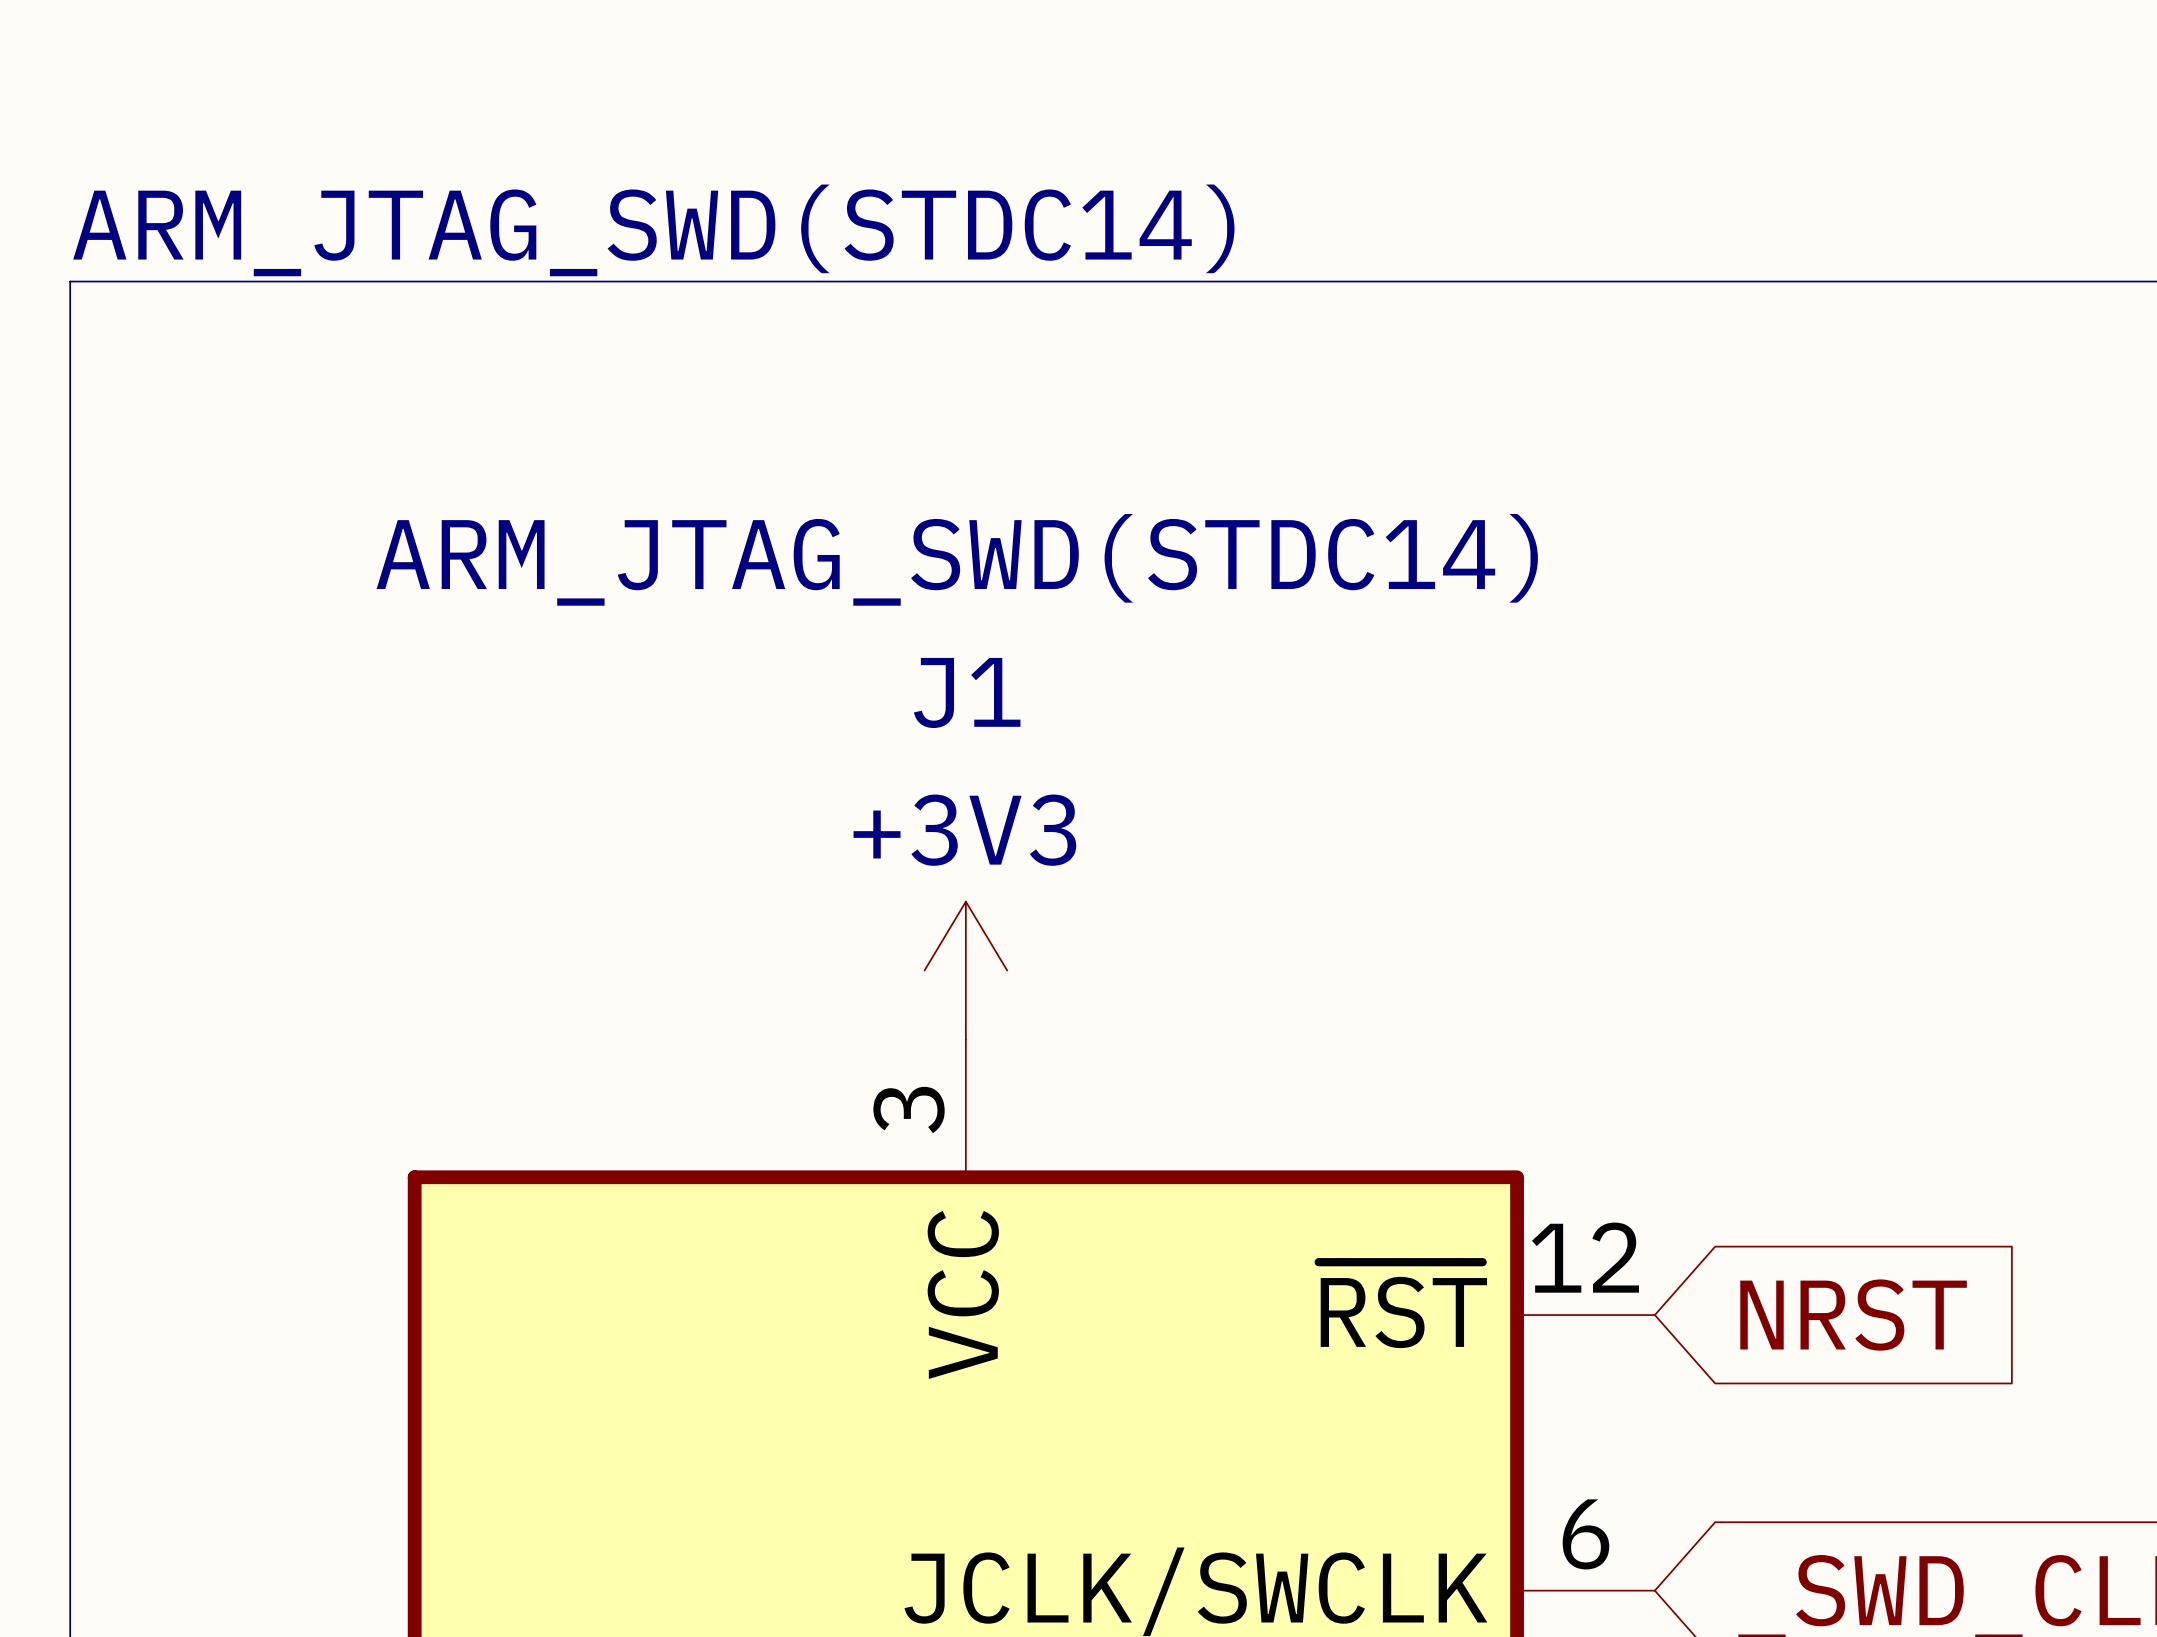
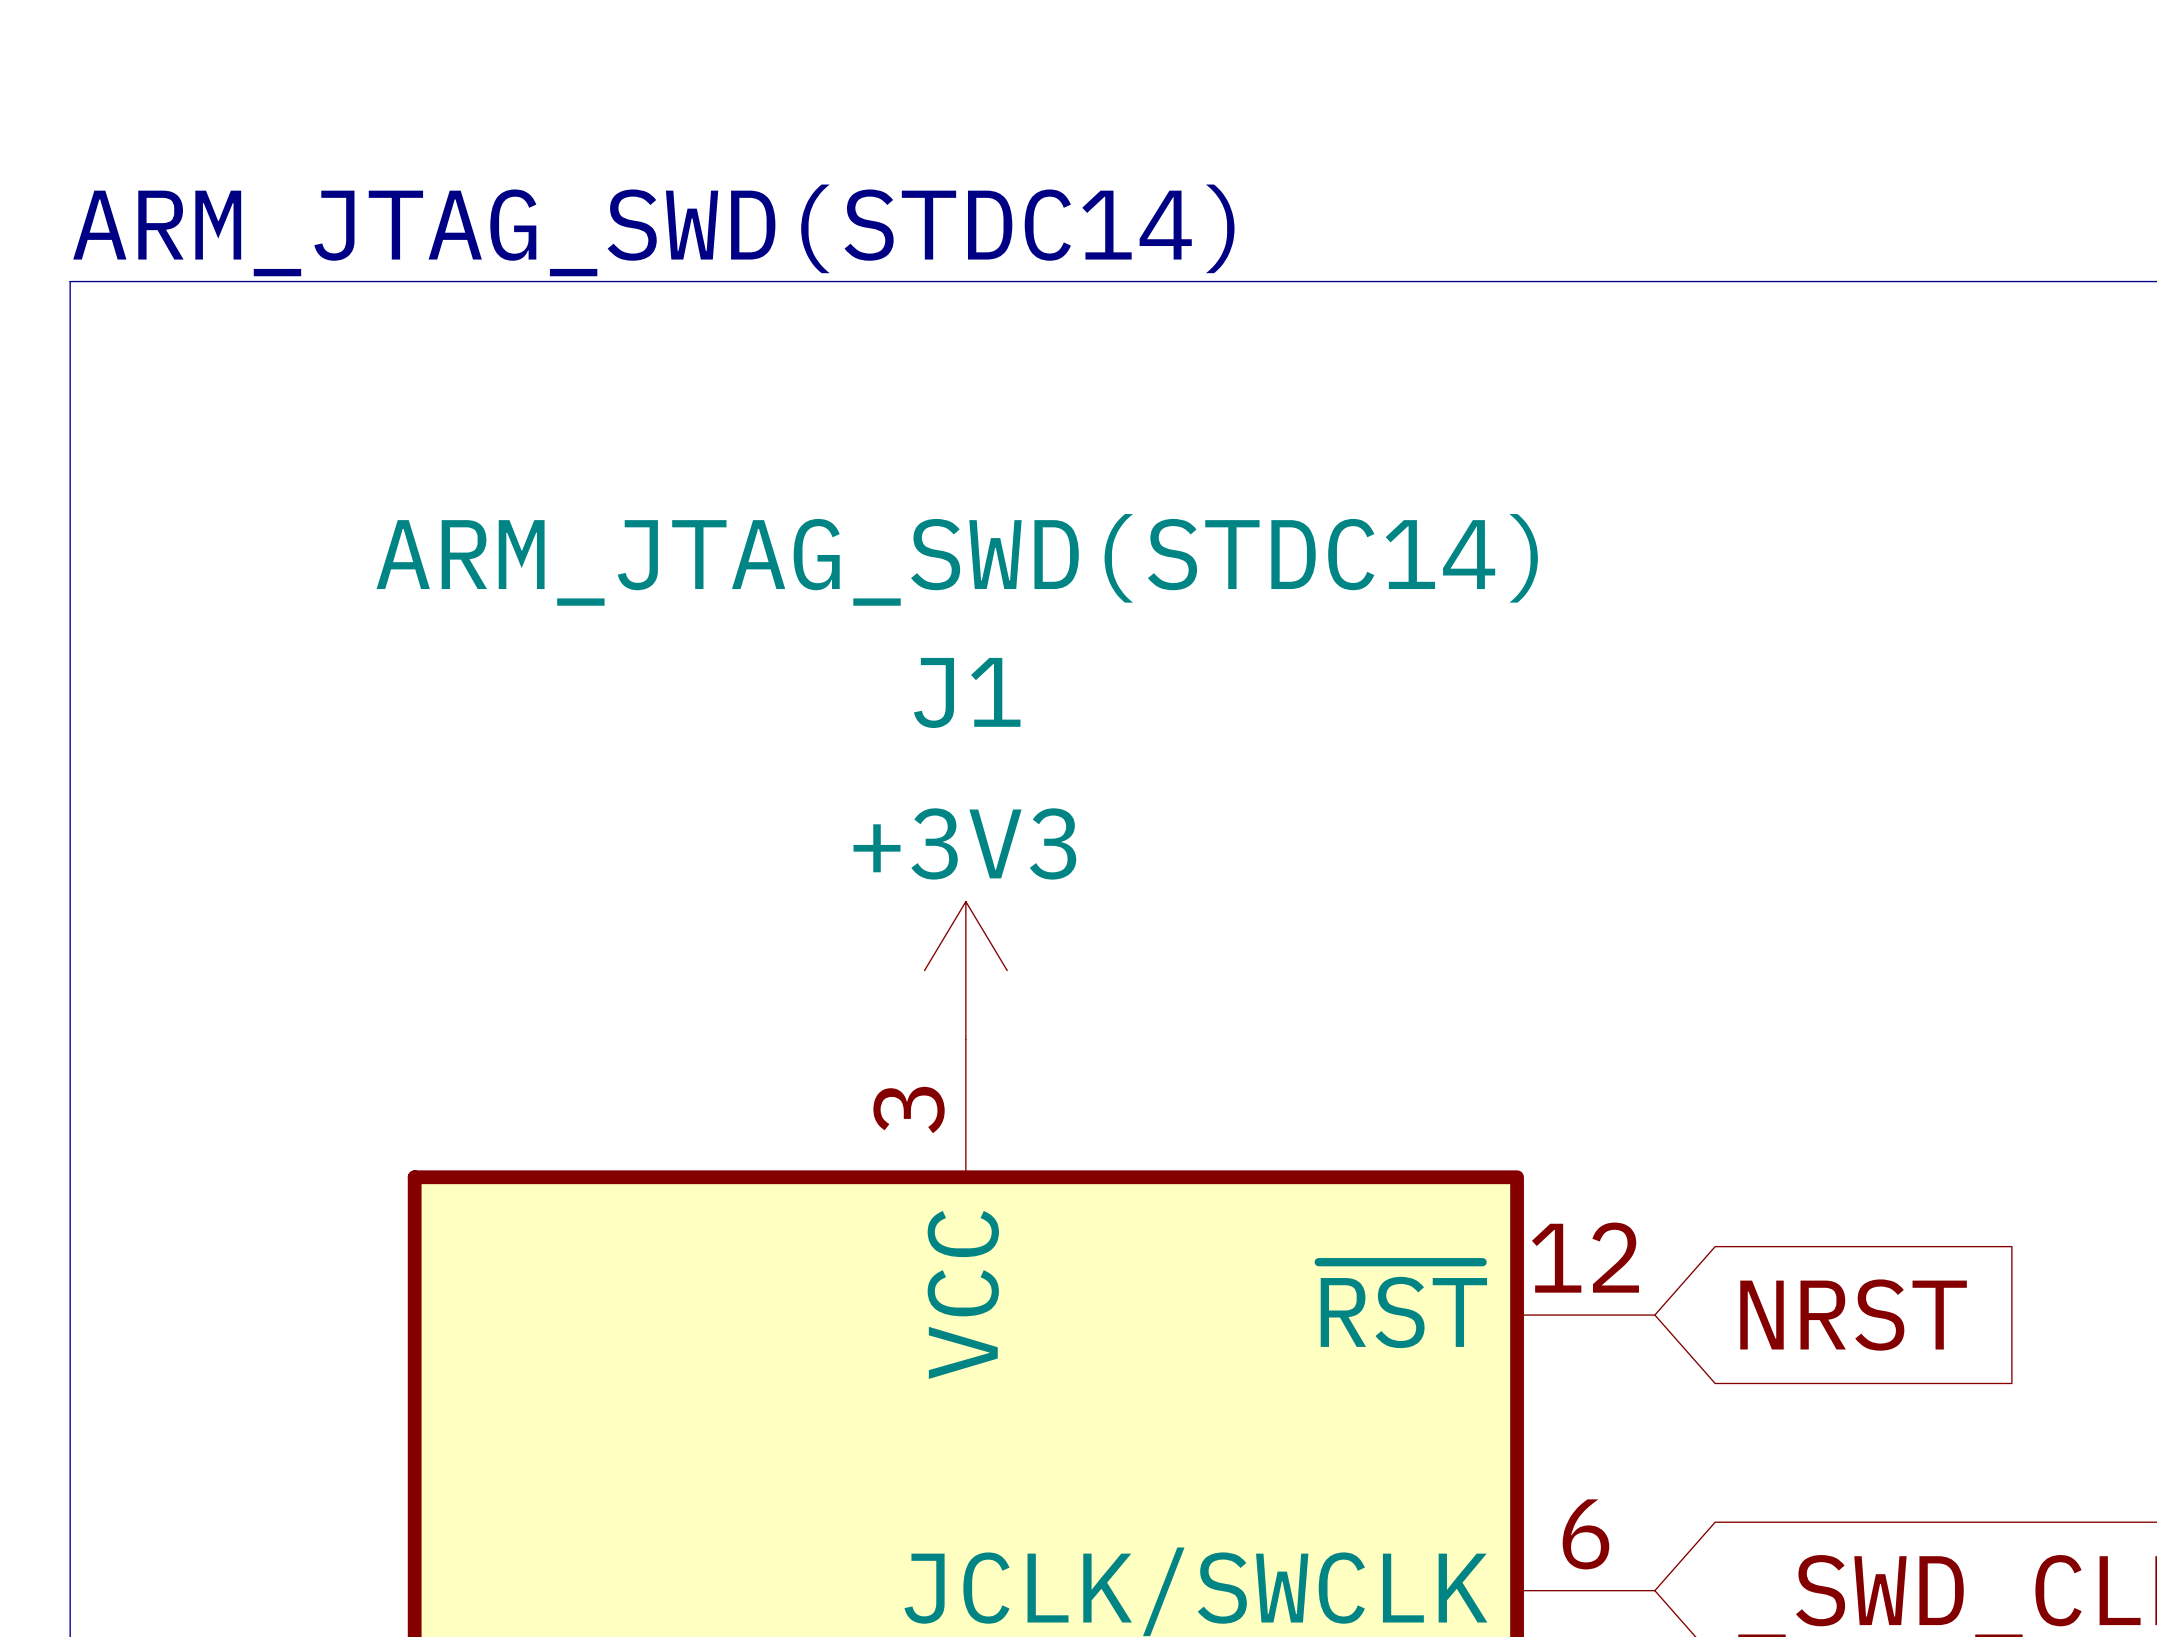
power symbol text position: +3V3 (964, 830) -> +3V3 (964, 843)

